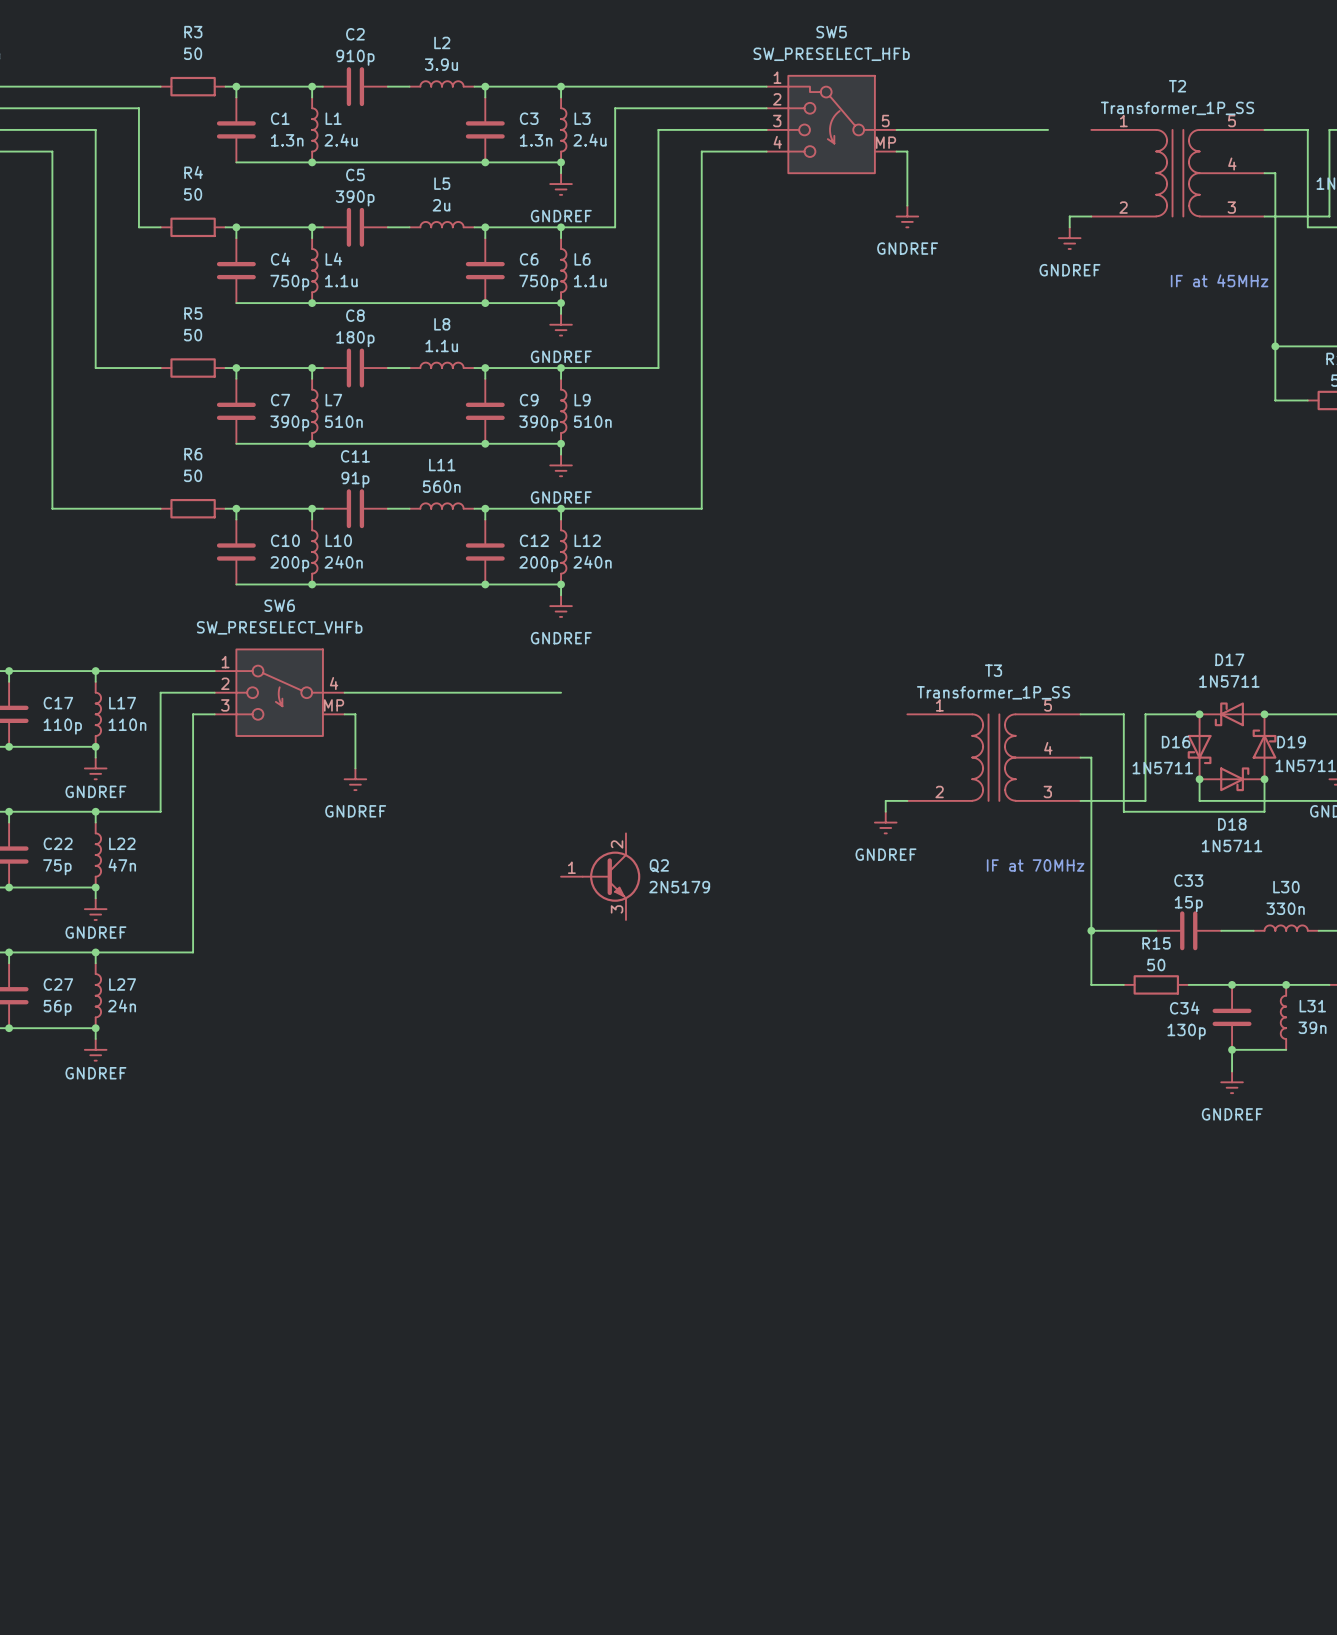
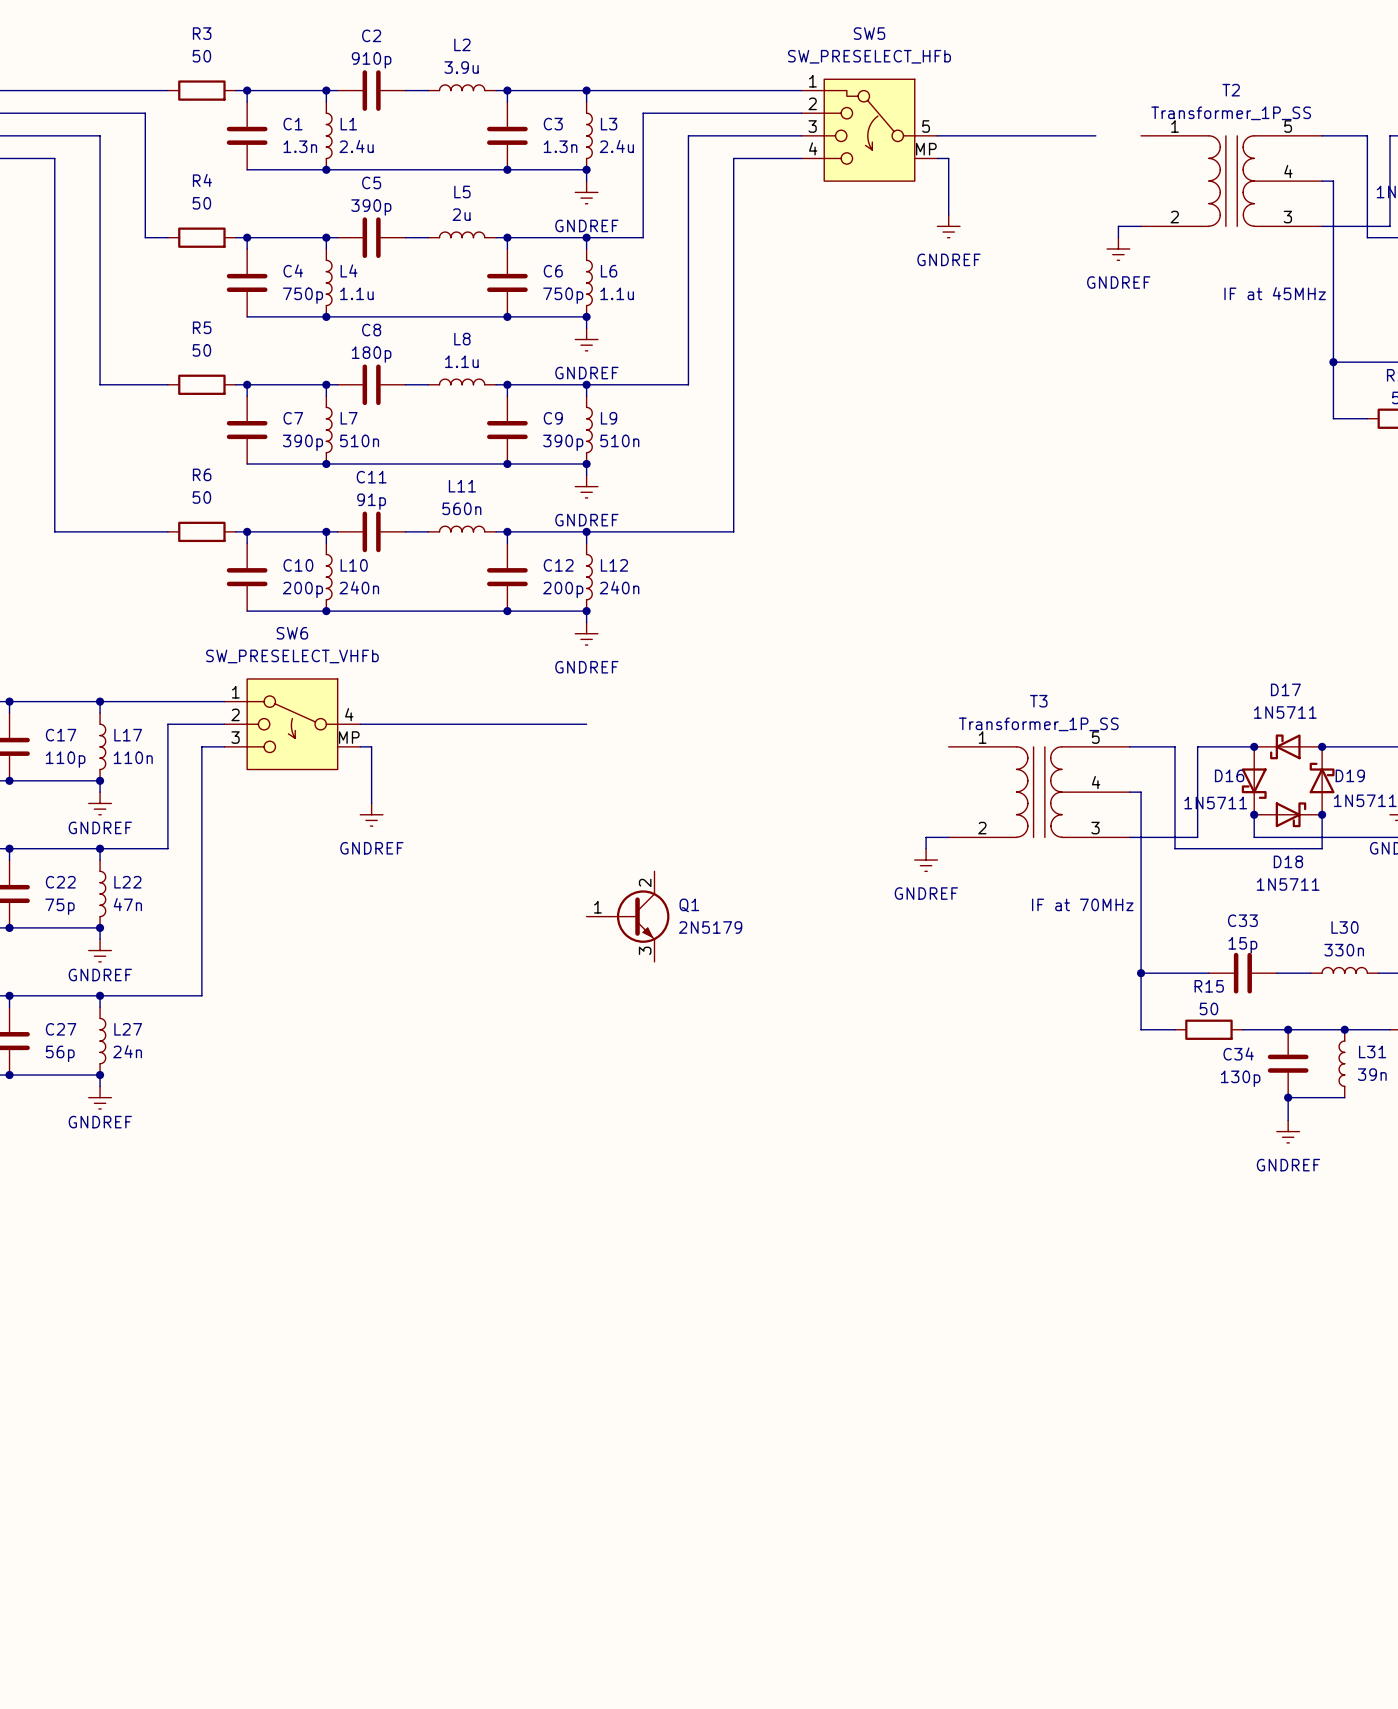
Q2 name: Q2 (659, 865) -> Q1 (689, 905)

